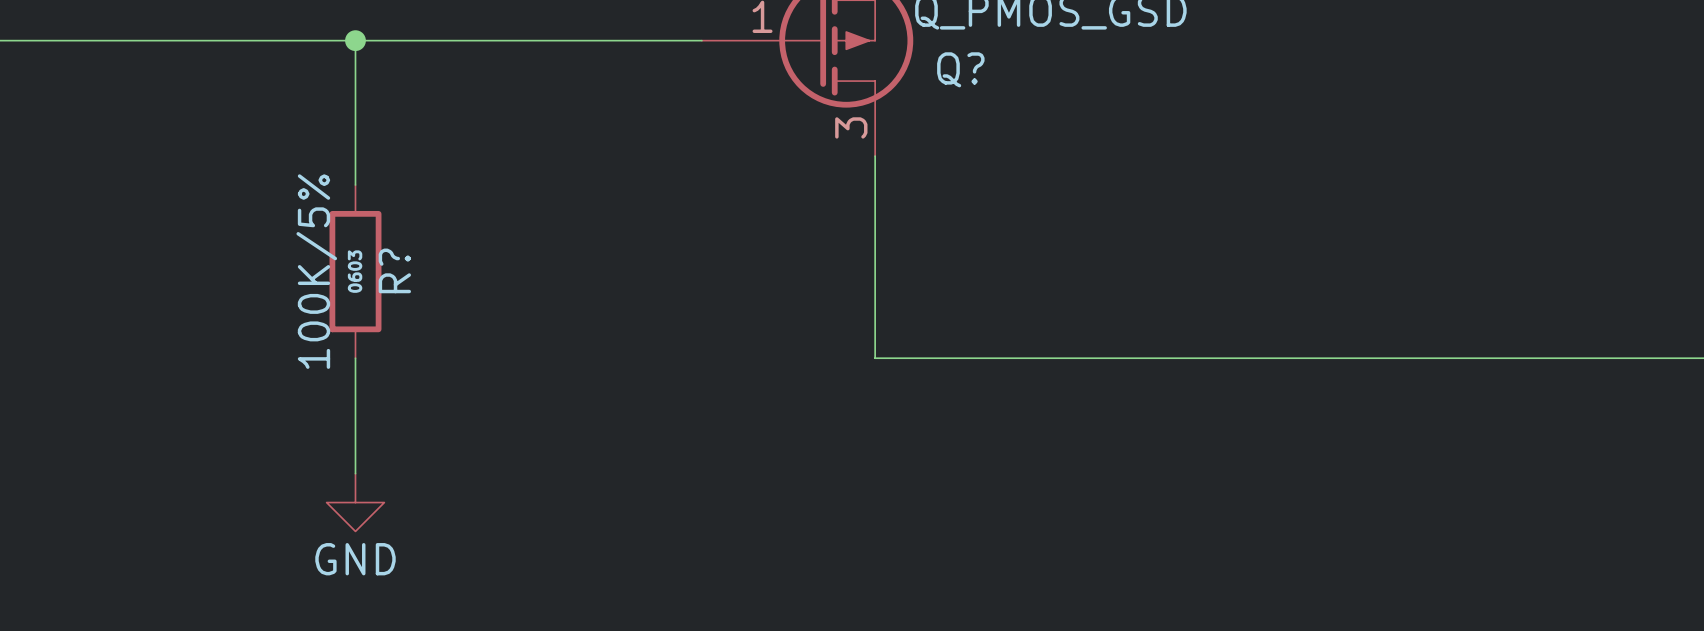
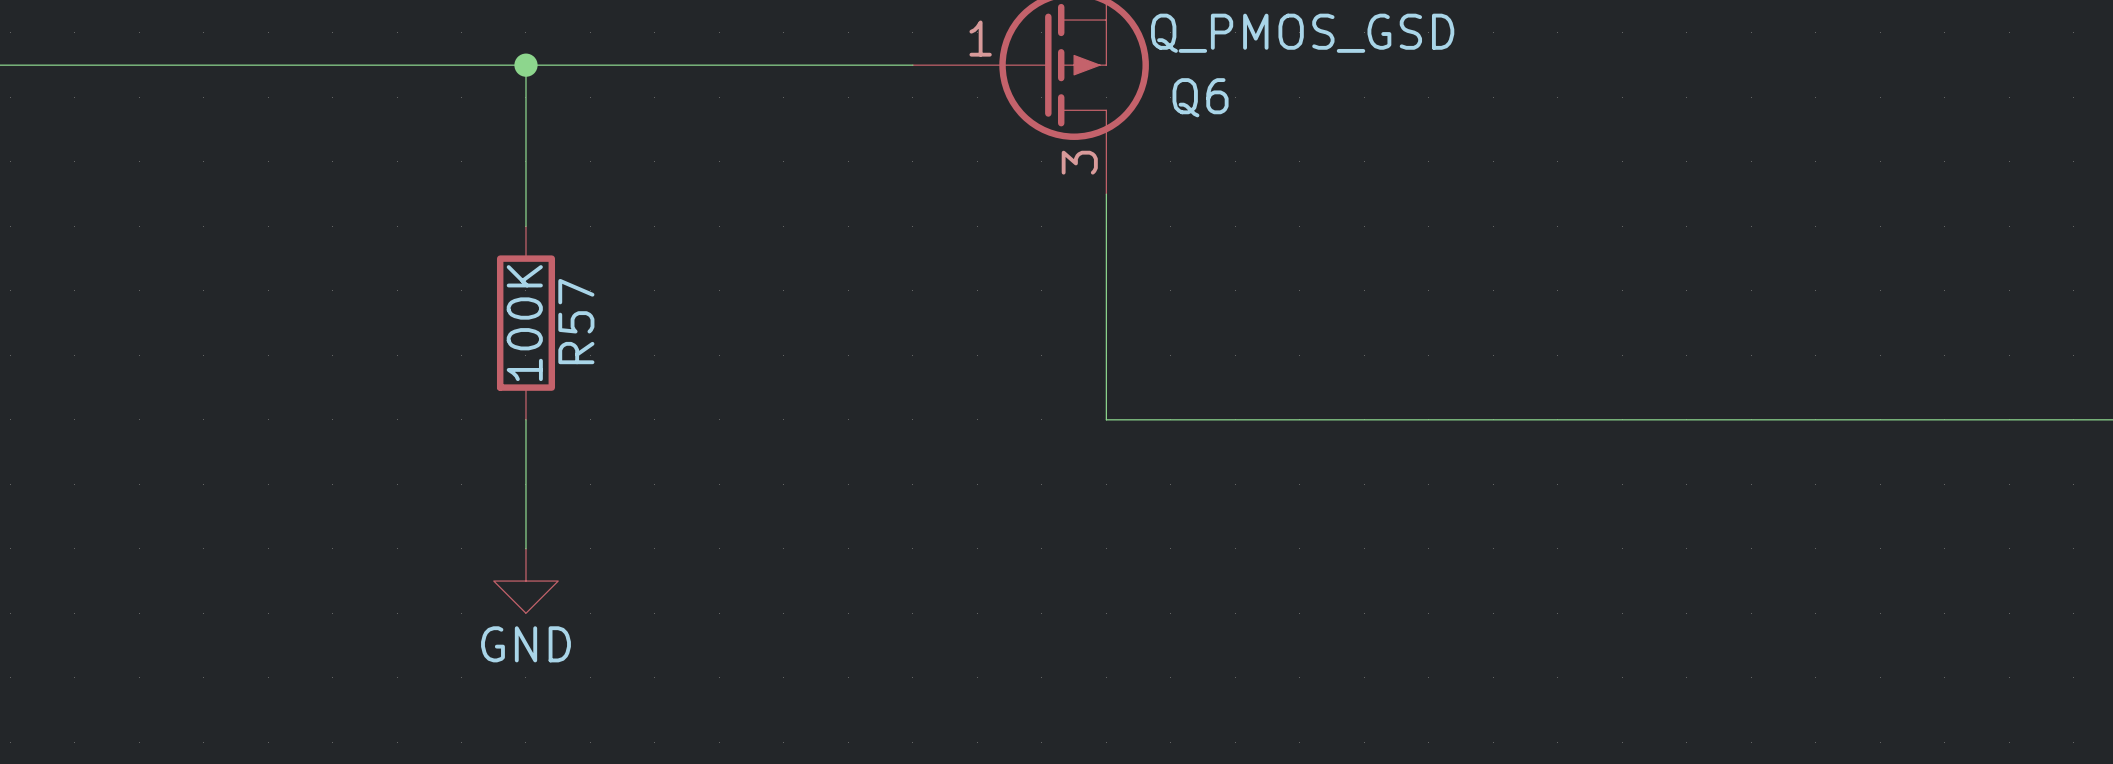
Q? name: Q? (960, 69) -> Q6 (1200, 97)
R? name: R? (394, 270) -> R57 (576, 321)
R? value: 100K/5% (316, 271) -> 100K (524, 323)
R? text: 0603 (355, 271) -> none

